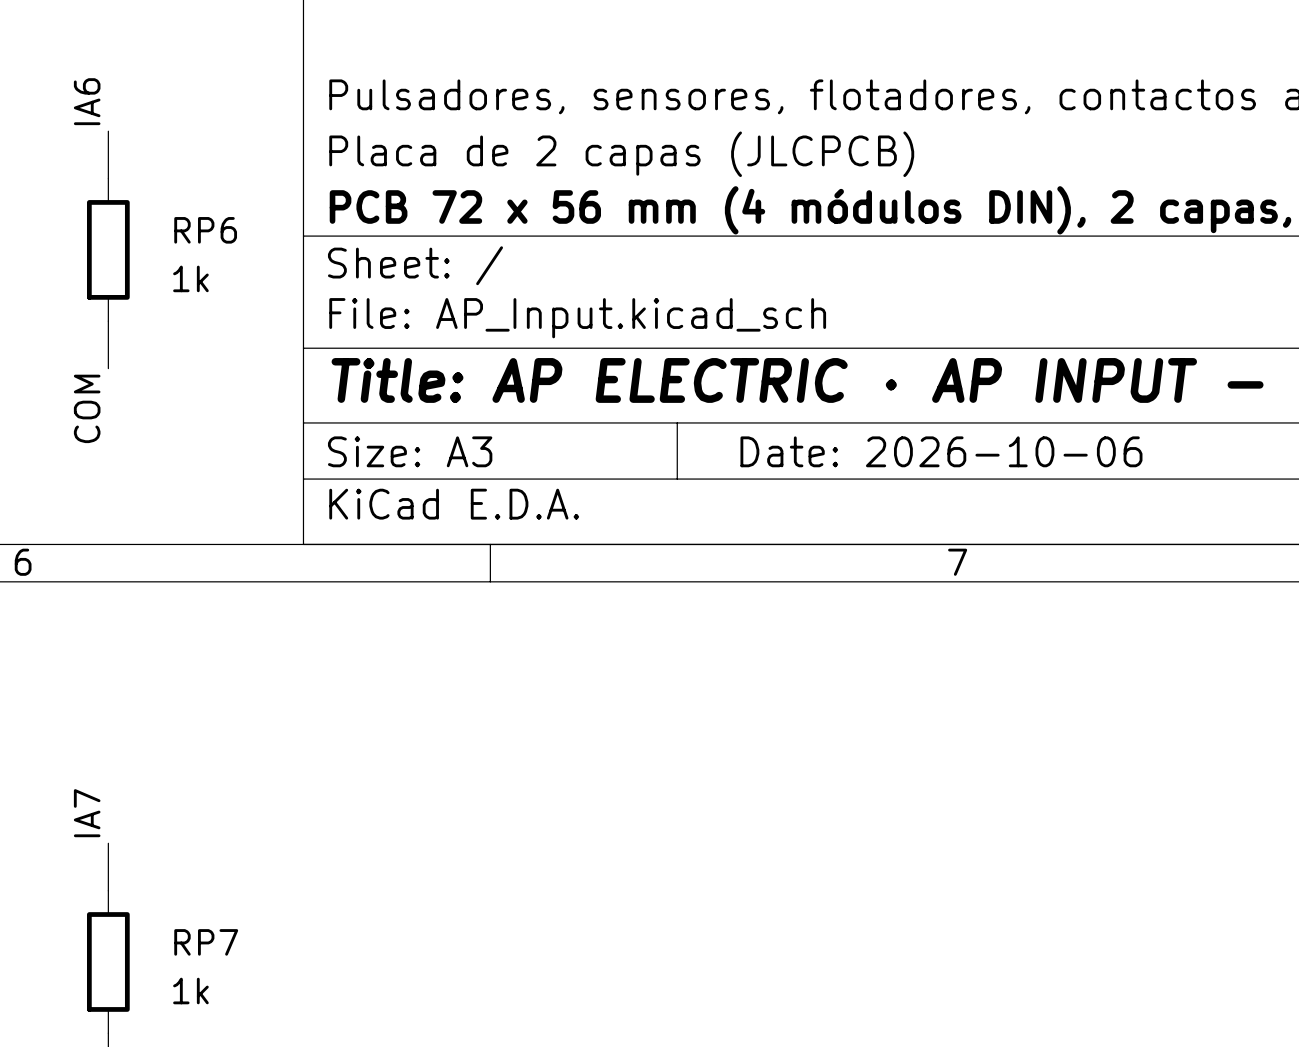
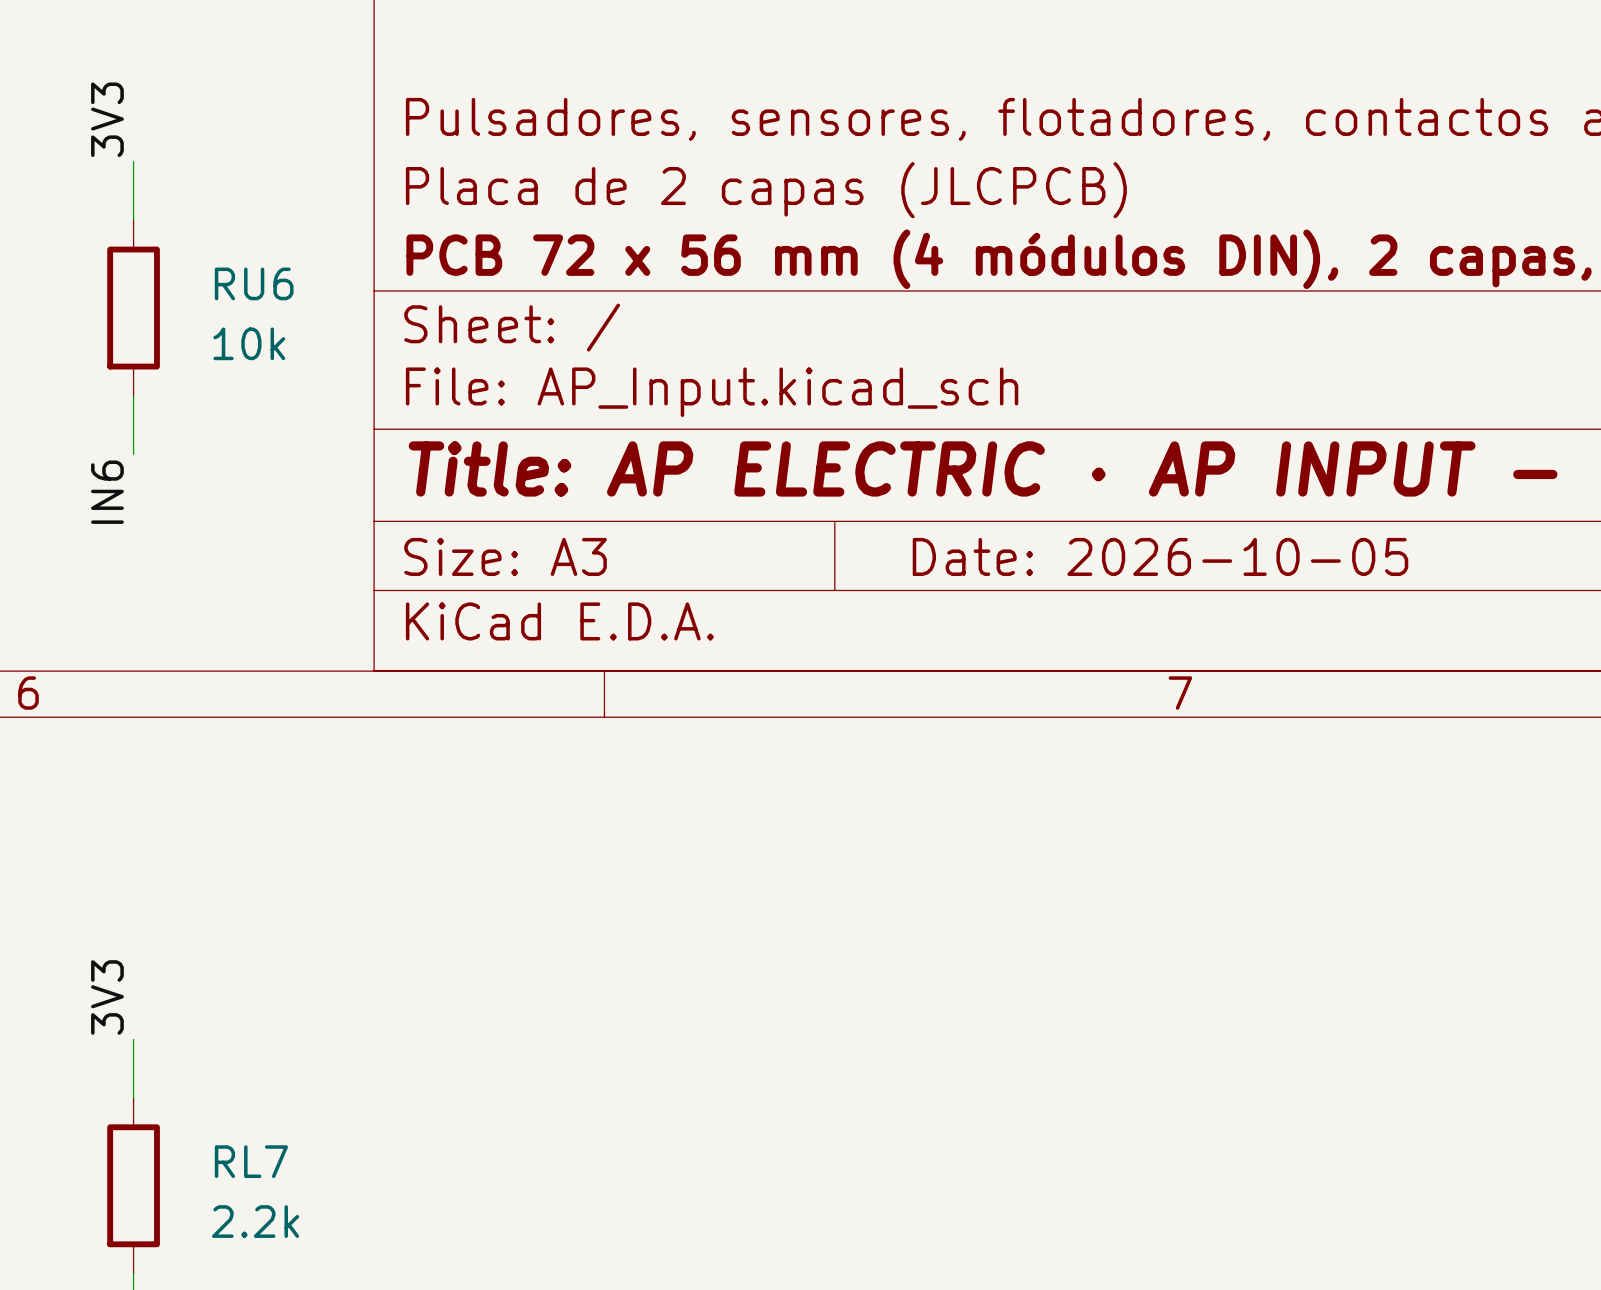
label: IA6 (87, 101) -> 3V3 (107, 119)
RP6 name: RP6 (205, 230) -> RU6 (254, 283)
RP6 value: 1k (190, 278) -> 10k (249, 343)
label: COM (87, 408) -> IN6 (107, 492)
title block: Date: 2026-10-06 (941, 451) -> Date: 2026-10-05 (1160, 556)
label: IA7 (87, 813) -> 3V3 (107, 997)
RP7 name: RP7 (206, 942) -> RL7 (251, 1161)
RP7 value: 1k (190, 991) -> 2.2k (255, 1221)

